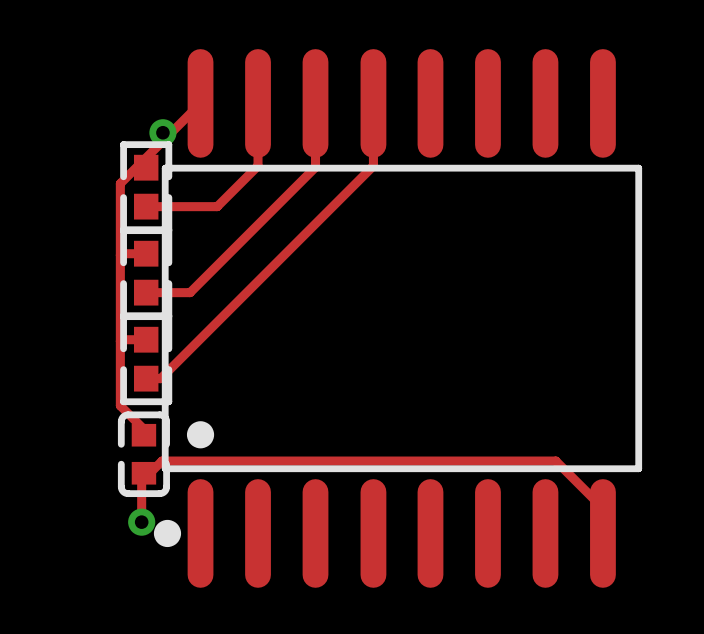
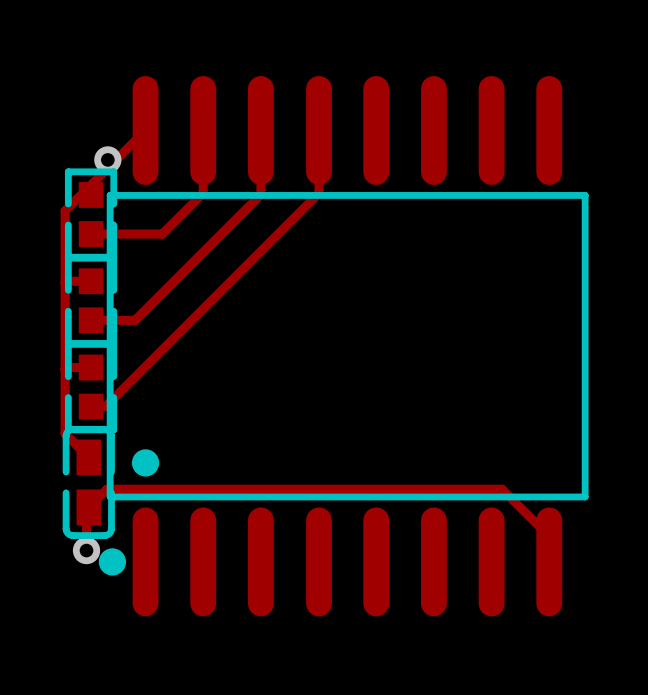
part footprint: [117, 411, 170, 498] -> [62, 425, 115, 539]

